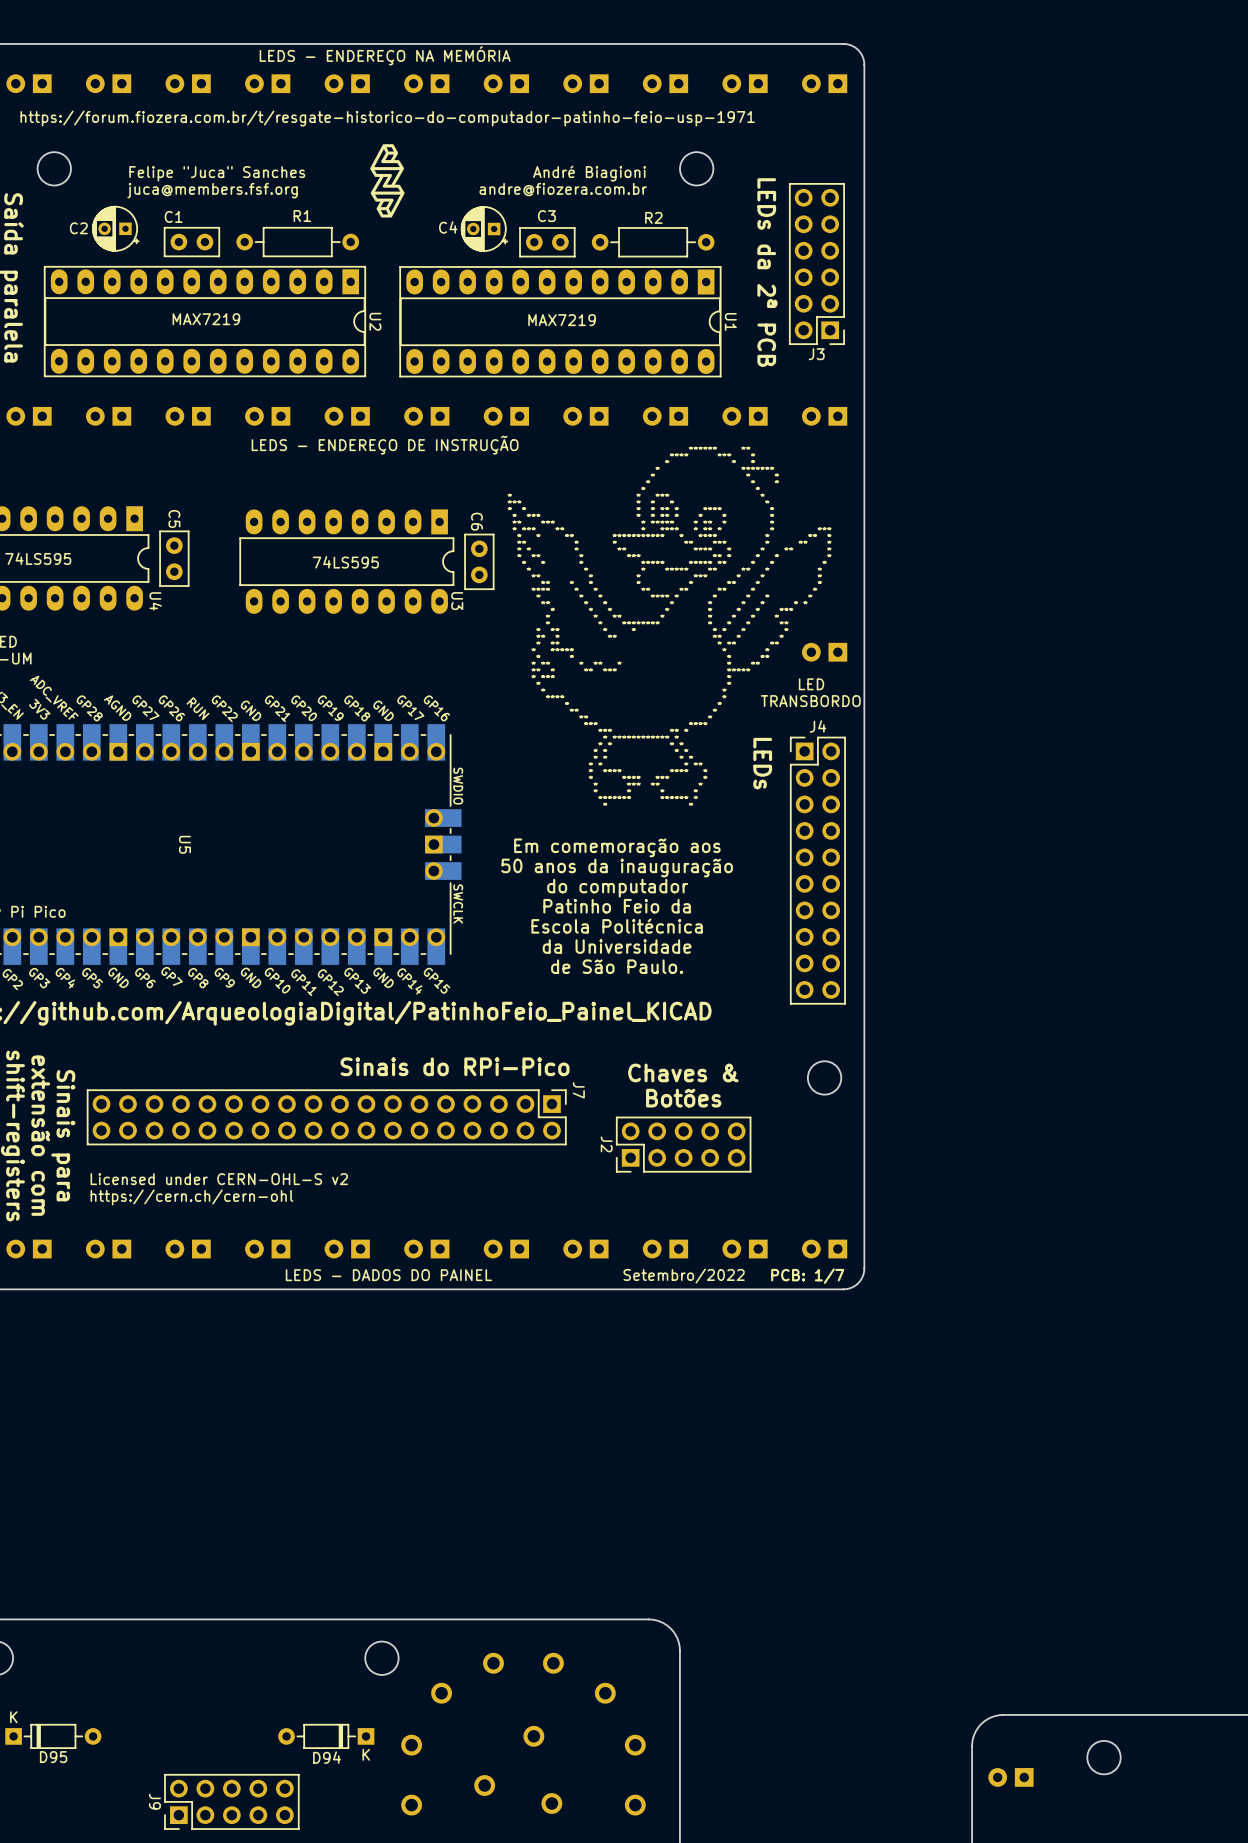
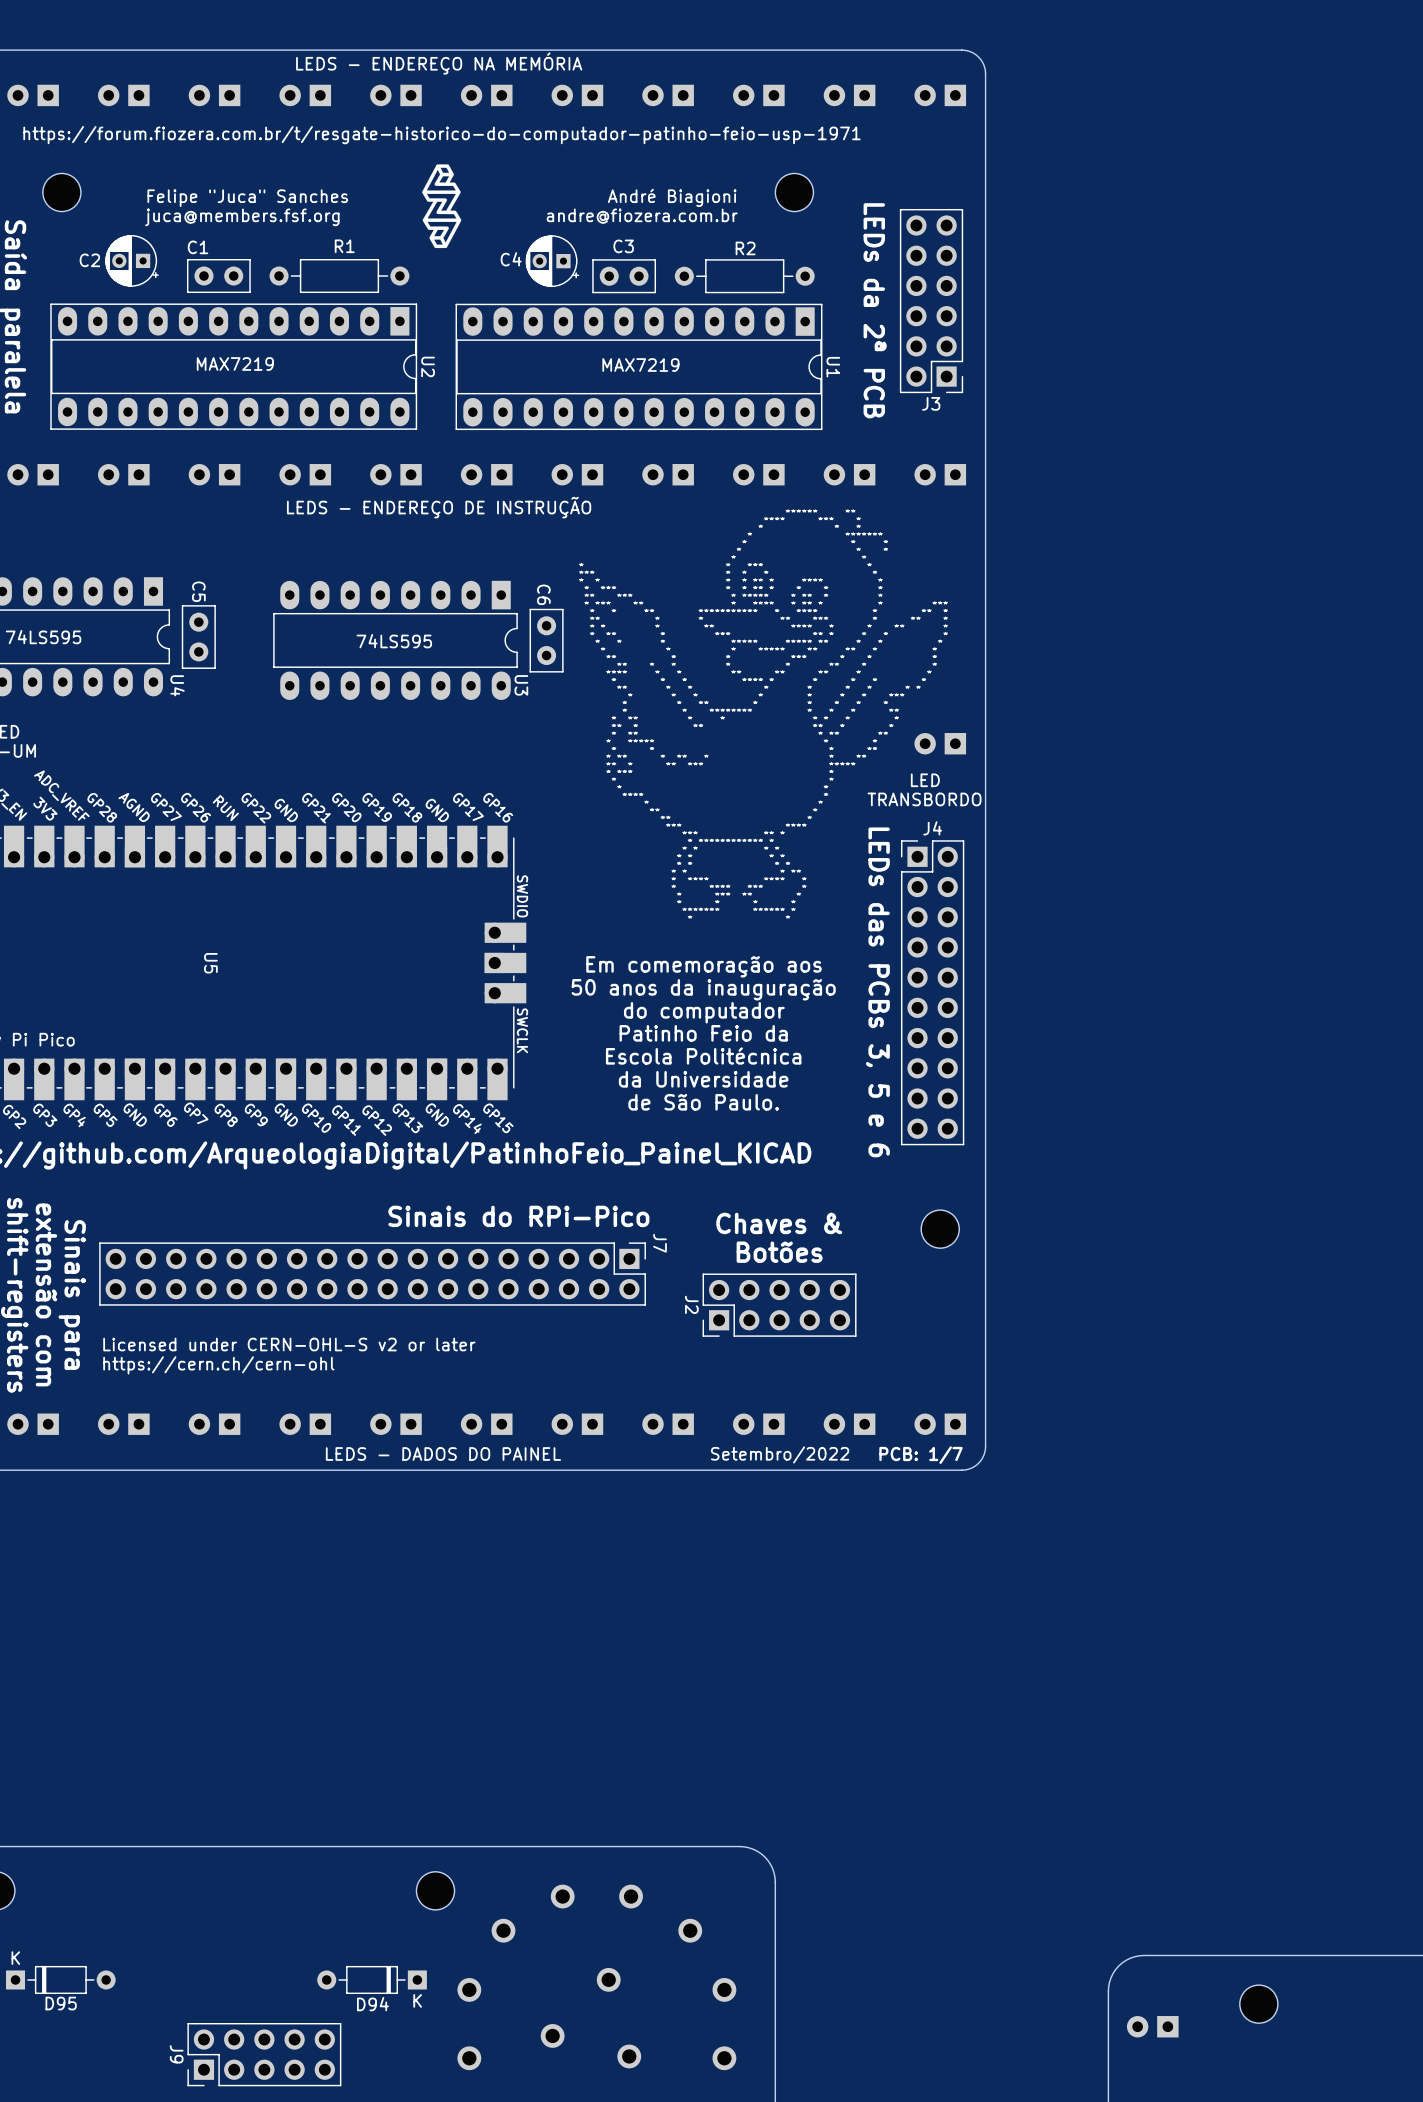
text: LEDs (762, 763) -> none
text: none -> LEDs das PCBs 3, 5 e 6 (877, 992)
text: Licensed under CERN-OHL-S v2 (219, 1179) -> Licensed under CERN-OHL-S v2 or later (289, 1344)

